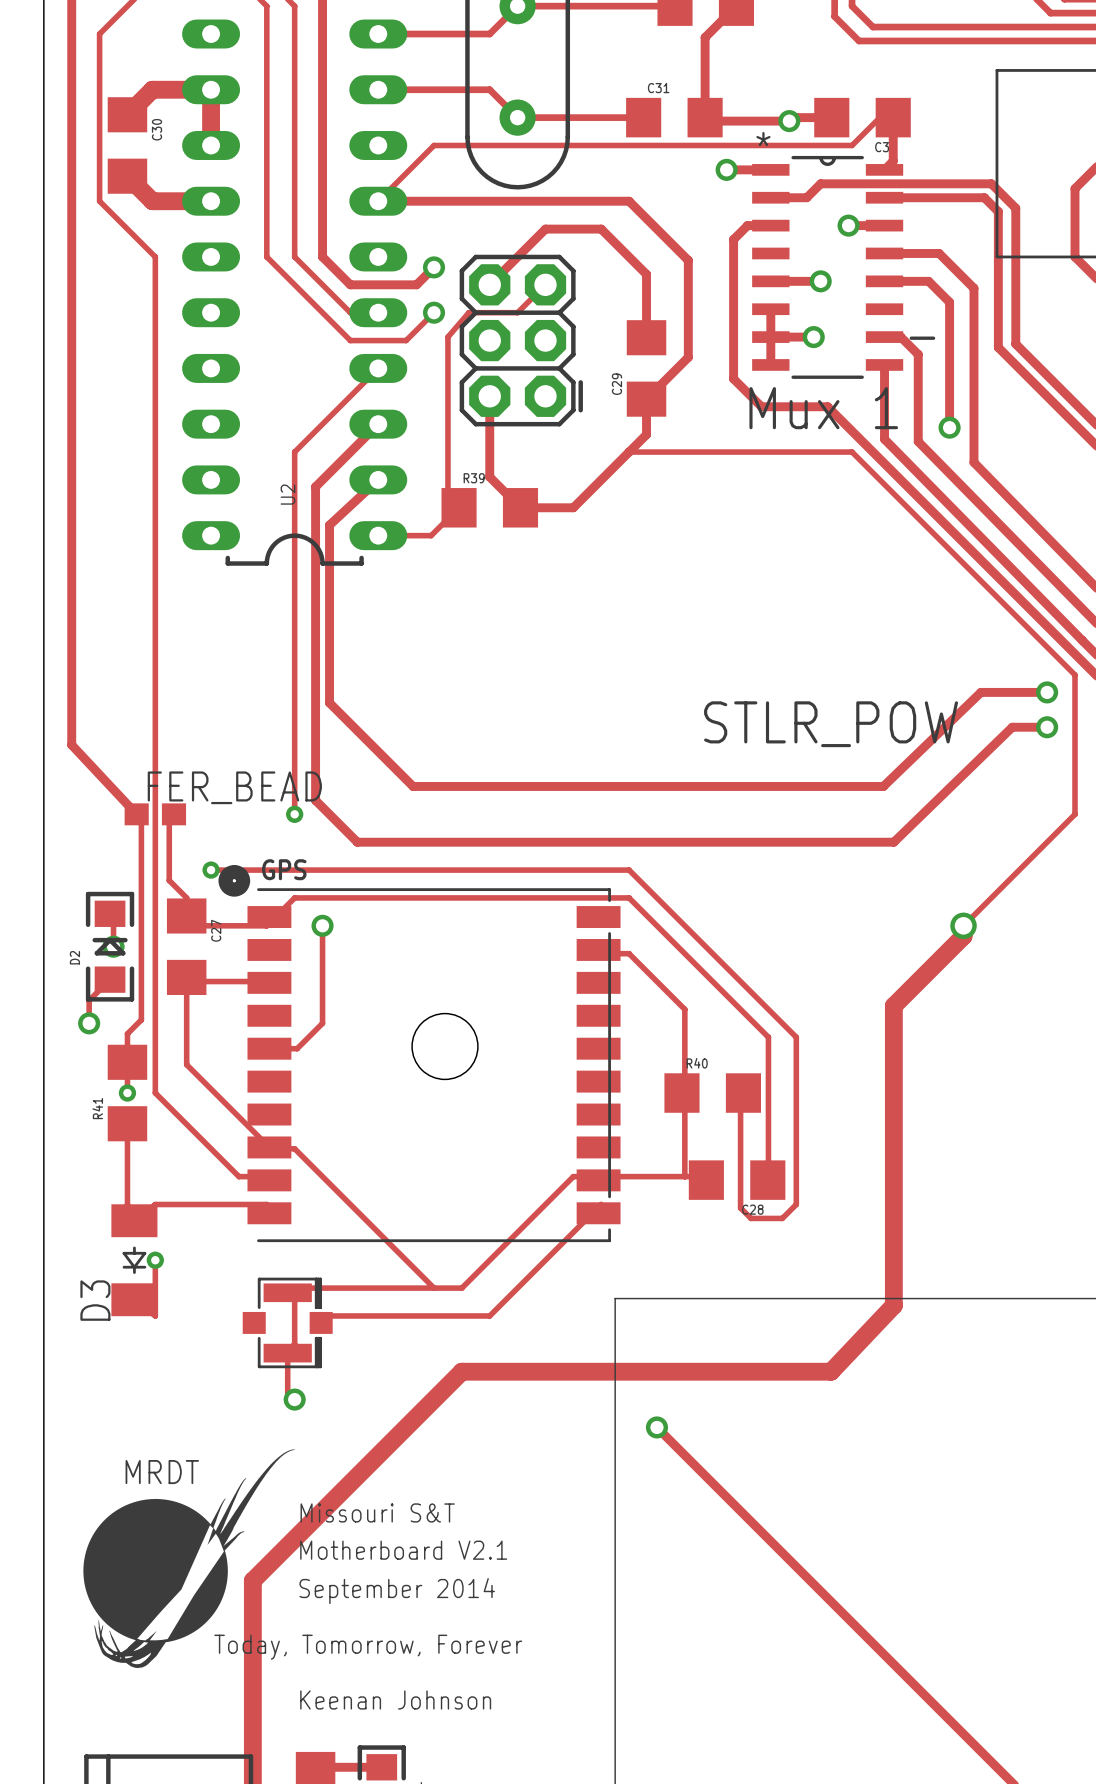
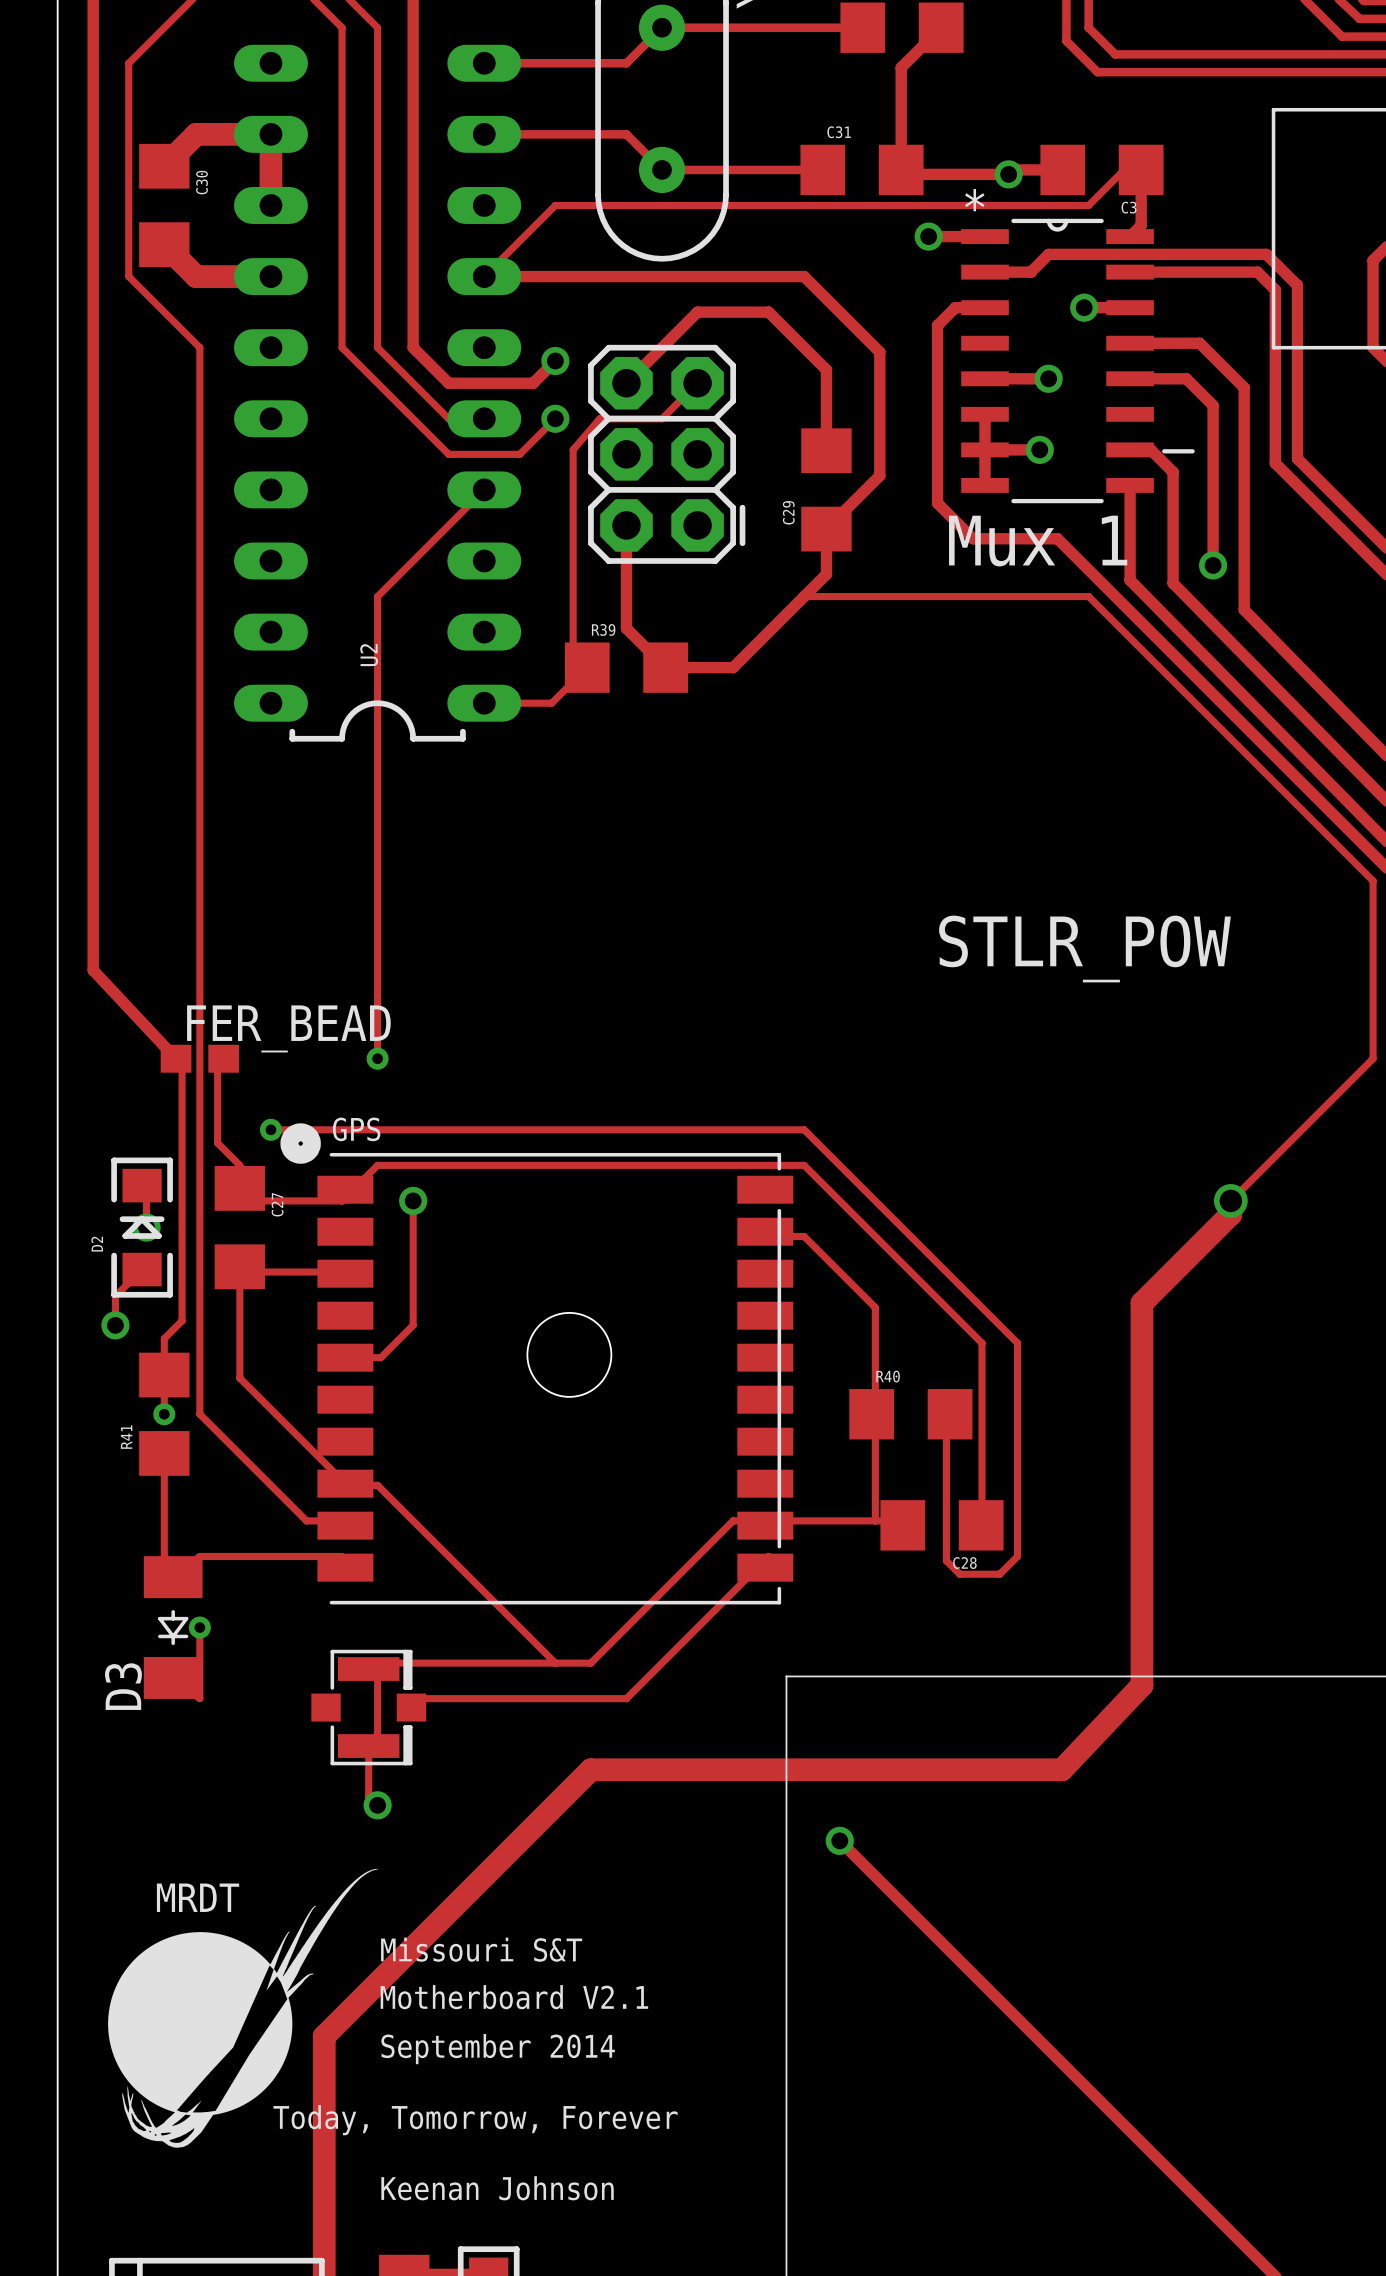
track: (378, 424) (315, 486) (315, 800) (357, 842) (893, 842) (1012, 727) (1047, 727) -> none
track: (378, 479) (329, 525) (329, 702) (413, 786) (883, 786) (980, 692) (1047, 692) -> none
via: (1047, 692) -> none
via: (1047, 727) -> none

